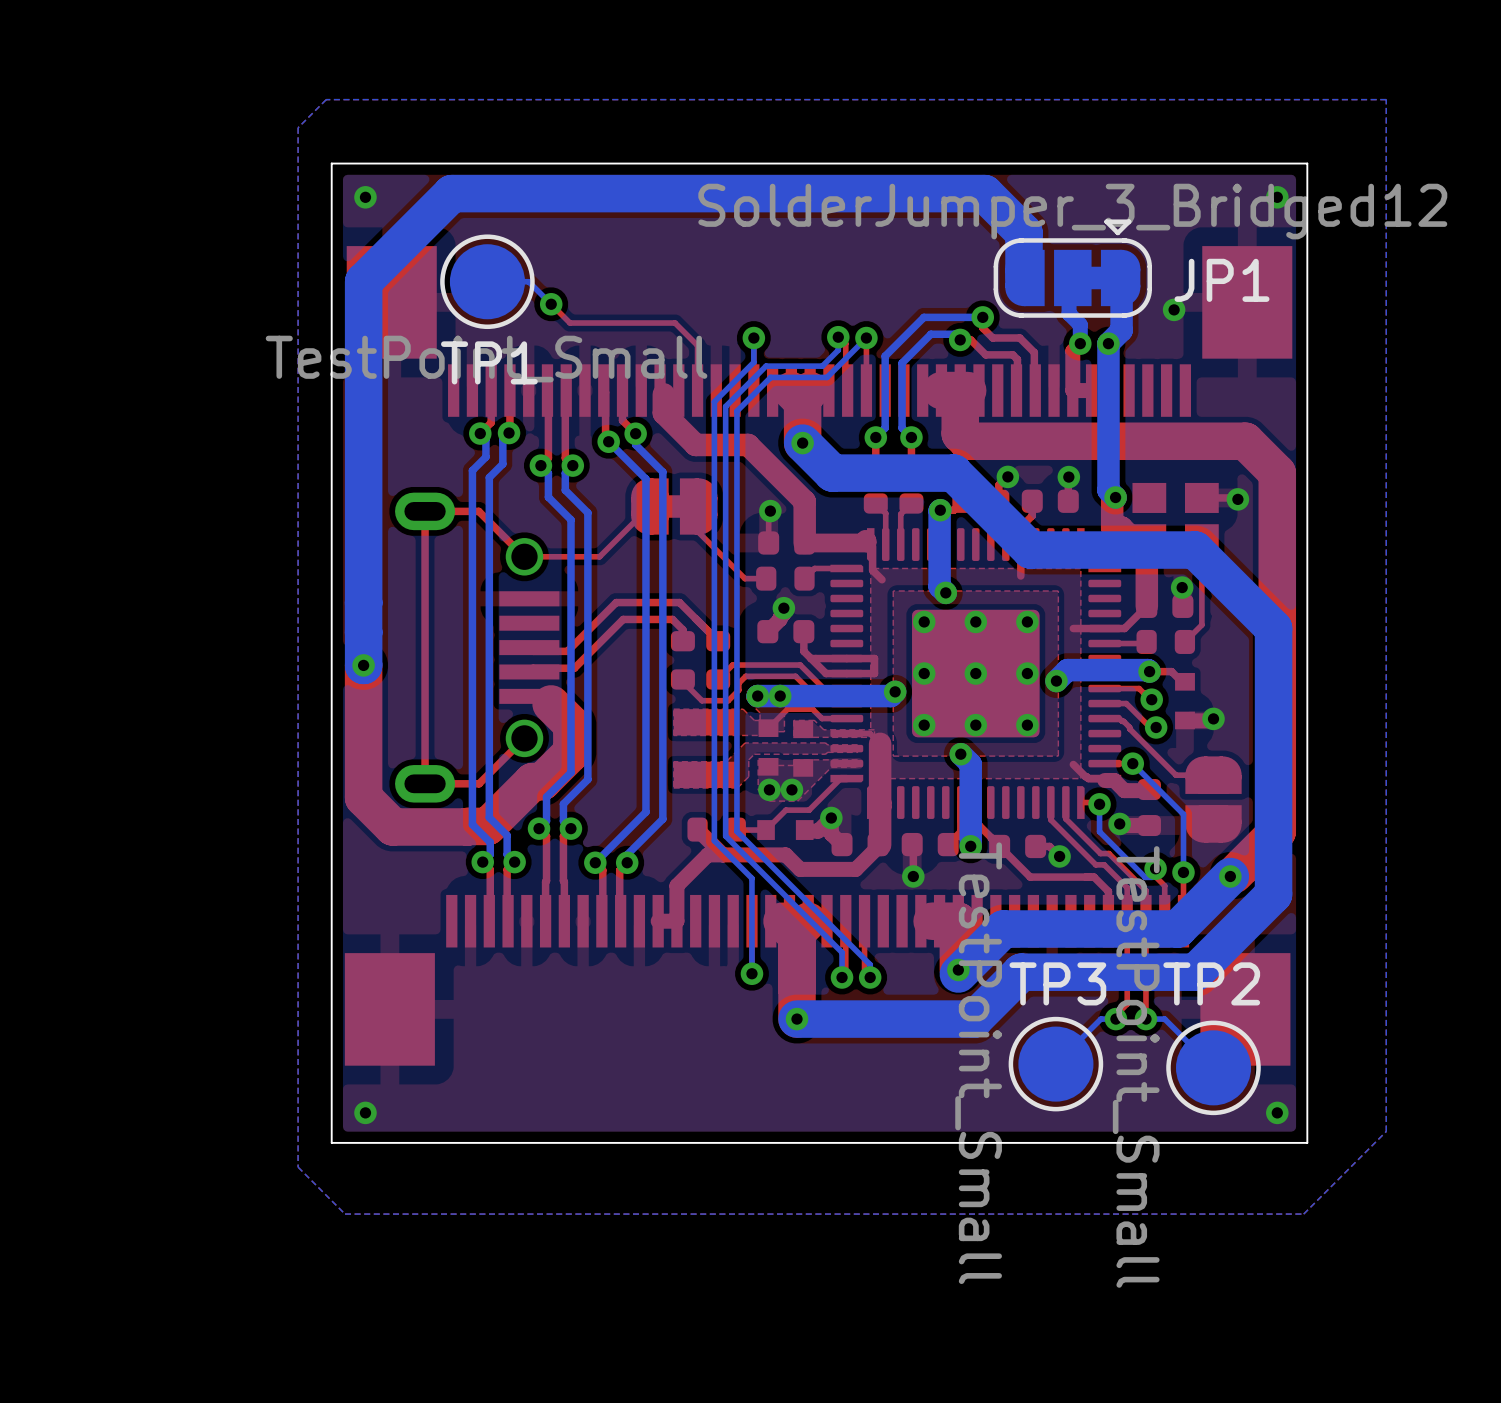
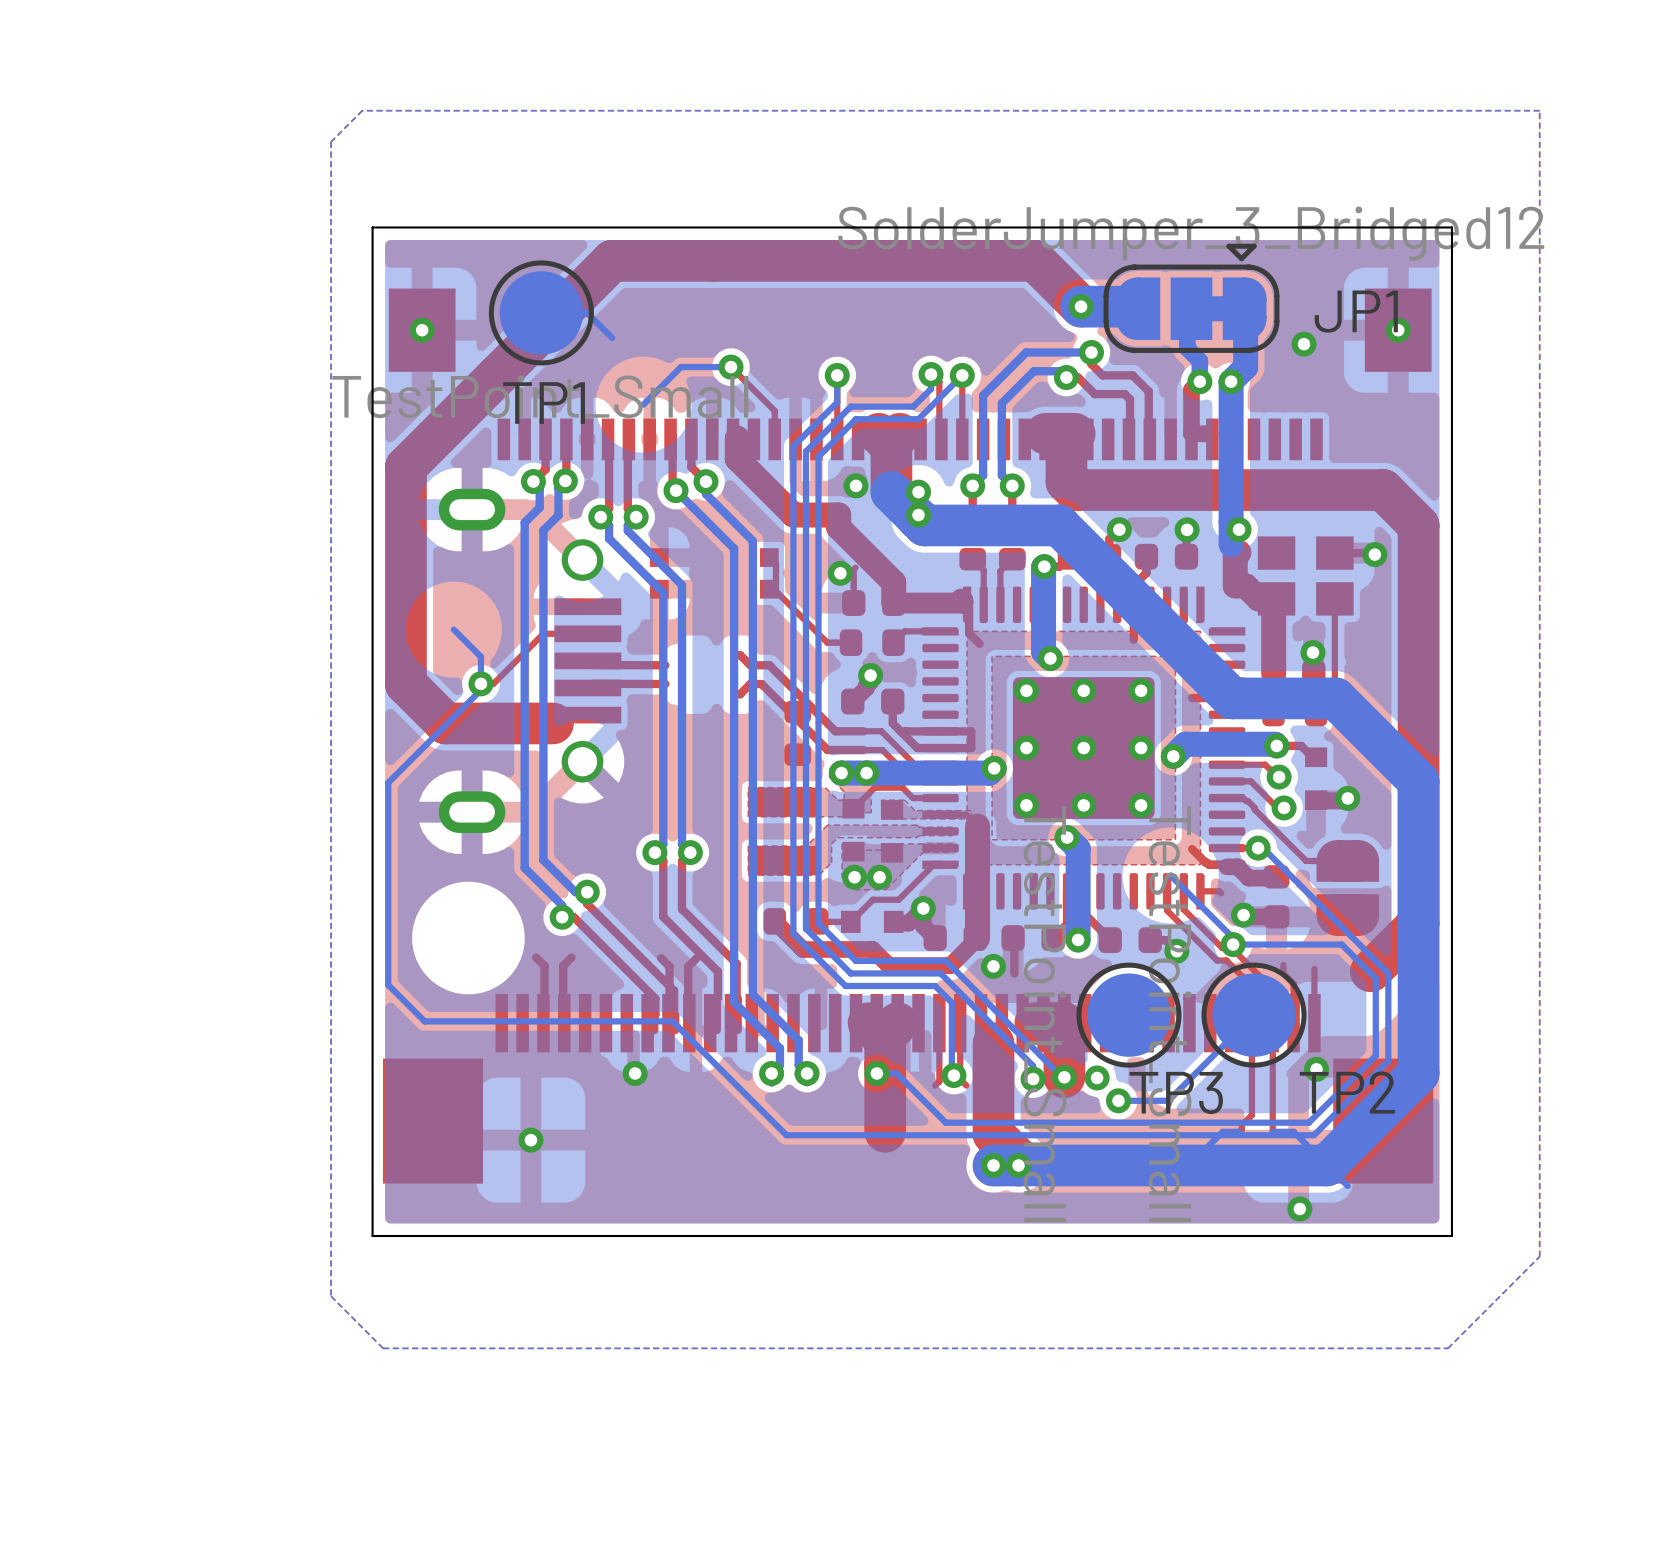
via: (365, 197) -> none
via position: (1277, 197) -> (1398, 330)
board edge: (1307, 204) (1307, 163) (331, 163) (331, 1142) (1307, 1142) (1307, 1112) -> (1451, 227) (372, 227) (372, 1236) (1451, 1236)
part footprint: [346, 246, 1293, 417] -> [388, 288, 1432, 461]
top track: none -> (1081, 306) (1035, 260) (612, 260) (405, 467) (405, 683) (445, 723) (552, 723)
via: none -> (1081, 306)
bottom track: (1024, 277) (1024, 232) (984, 193) (451, 193) (363, 281) (363, 665) -> (1137, 308) (1135, 306) (1081, 306)
via: none -> (422, 330)
top track: (551, 304) (569, 323) (675, 323) (697, 345) (697, 369) -> (730, 367) (774, 410)
via: (551, 304) -> none
bottom track: none -> (730, 367) (680, 367) (643, 404)
via: none -> (730, 367)
via: none -> (856, 485)
via: (802, 443) -> none
via: none -> (918, 492)
top track: (695, 444) (748, 444) (804, 501) (804, 524) -> (772, 494) (793, 515) (838, 515) (838, 527) (893, 582)
via: none -> (918, 515)
bottom track: (662, 472) (662, 819) (627, 854) (627, 866) -> (736, 524) (752, 540) (752, 994) (798, 1040) (798, 1065) (807, 1073)
bottom track: (565, 477) (565, 490) (587, 512) (587, 779) (563, 804) (563, 821) (570, 828) -> (627, 530) (682, 585) (682, 844) (690, 852)
part footprint: [631, 478, 718, 535] -> [649, 548, 779, 599]
bottom track: (645, 479) (645, 812) (595, 862) -> (717, 532) (734, 548) (734, 1002) (779, 1048) (779, 1065) (771, 1073) (771, 1082) (779, 1073)
bottom track: (548, 484) (548, 497) (571, 519) (571, 772) (546, 797) (546, 821) (539, 828) -> (609, 538) (663, 592) (663, 844) (654, 852)
via position: (1115, 497) -> (1239, 529)
top track: (649, 506) (599, 556) (524, 556) (524, 546) -> none
via position: (770, 511) -> (840, 573)
bottom track: (1030, 550) (1195, 550) (1273, 628) (1273, 894) (1195, 972) (1021, 972) (974, 1019) (797, 1019) -> (1144, 610) (1232, 698) (1335, 698) (1418, 781) (1418, 1073) (1326, 1165) (993, 1165)
top track: (524, 556) (478, 511) (425, 511) (425, 783) (479, 783) (524, 738) -> none
top track: none -> (587, 633) (543, 633) (493, 683) (480, 683)
top track: none -> (665, 665) (592, 665)
top track: none -> (665, 684) (592, 683)
top track: (682, 641) (682, 629) (672, 619) (623, 619) (574, 668) (533, 668) (529, 671) -> none
top track: (718, 641) (679, 602) (616, 602) (567, 651) (533, 651) (529, 647) -> none
part position: (477, 647) -> (530, 660)
part: (682, 660) -> none
top track: (363, 665) (363, 797) (392, 826) (487, 826) (532, 781) (542, 781) (571, 752) (571, 724) (551, 703) -> none
via position: (363, 665) -> (480, 683)
top track: (800, 665) (732, 665) (718, 679) -> (888, 738) (881, 731) (835, 731) (769, 665) (750, 665) (738, 655)
top track: (795, 676) (745, 676) (738, 683) (738, 690) (728, 700) (701, 700) (682, 679) -> (883, 751) (827, 750) (761, 684) (750, 684) (738, 694)
bottom track: (1132, 763) (1183, 814) (1183, 876) -> (1258, 848) (1263, 848) (1388, 973) (1388, 1060) (1314, 1135) (786, 1135) (672, 1021) (424, 1021) (388, 984) (388, 782) (480, 690) (480, 656) (453, 629)
top track: none -> (654, 852) (663, 860) (663, 916) (717, 971) (716, 1030)
via: none -> (654, 852)
top track: none -> (690, 852) (682, 860) (682, 909) (736, 963) (737, 1030)
via: none -> (690, 852)
bottom track: (489, 774) (489, 817) (507, 835) (507, 854) (514, 862) -> (543, 860) (575, 892) (587, 892)
bottom track: (472, 781) (472, 824) (490, 842) (490, 854) (482, 862) -> (524, 867) (562, 905) (562, 917)
bottom track: none -> (1170, 875) (1233, 938) (1233, 944) (1341, 944) (1375, 978) (1375, 1055) (1308, 1122) (945, 1122) (896, 1073) (876, 1073)
top track: none -> (587, 892) (587, 903) (674, 990) (675, 1030)
via: none -> (587, 892)
bottom track: (1099, 804) (1099, 831) (1145, 877) (1152, 877) -> none
via: (1099, 804) -> none
top track: none -> (562, 917) (573, 917) (655, 998) (654, 1030)
via: none -> (562, 917)
top track: (539, 828) (546, 836) (545, 921) -> none
via: (539, 828) -> none
top track: (570, 828) (563, 836) (564, 921) -> none
via: (570, 828) -> none
top track: (999, 846) (1030, 877) (1094, 877) (1108, 891) (1108, 921) -> none
via: none -> (1233, 944)
top track: (722, 854) (707, 854) (676, 885) (676, 921) (658, 921) -> none
via: (482, 862) -> none
via: (514, 862) -> none
via: (595, 862) -> none
via: (627, 862) -> none
bottom track: (770, 865) (870, 964) (870, 977) -> (855, 960) (945, 960) (1061, 1076) (1065, 1076)
via: (1155, 868) -> none
via: (1183, 872) -> none
bottom track: (766, 876) (842, 952) (842, 975) -> (850, 973) (940, 973) (1033, 1065) (1033, 1079)
via position: (913, 876) -> (993, 966)
bottom track: (1230, 876) (1177, 929) (1003, 929) (958, 974) -> none
via: (1230, 876) -> none
bottom track: (751, 878) (751, 977) -> (835, 975) (845, 986) (935, 986) (951, 1002) (951, 1073) (953, 1075)
bottom track: none -> (1254, 1015) (1168, 1100) (1118, 1100)
top track: none -> (993, 1043) (993, 1133) (1018, 1158) (1018, 1165) (1011, 1158) (1000, 1158) (993, 1165)
via: none -> (1316, 1069)
via: none -> (635, 1073)
via: none -> (771, 1073)
via: none -> (807, 1073)
via: none -> (876, 1073)
via: none -> (953, 1075)
via: none -> (1097, 1077)
via: none -> (1033, 1079)
via: (751, 973) -> none
via: (842, 977) -> none
via: (870, 977) -> none
via: none -> (1118, 1100)
via: (797, 1019) -> none
via: (1115, 1019) -> none
via: (1145, 1019) -> none
via: none -> (530, 1140)
via: none -> (993, 1165)
via: none -> (1018, 1165)
TP3 position: (1055, 1064) -> (1128, 1015)
TP2 position: (1213, 1067) -> (1254, 1015)
via: none -> (1299, 1208)
via: (365, 1112) -> none
via: (1277, 1112) -> none

